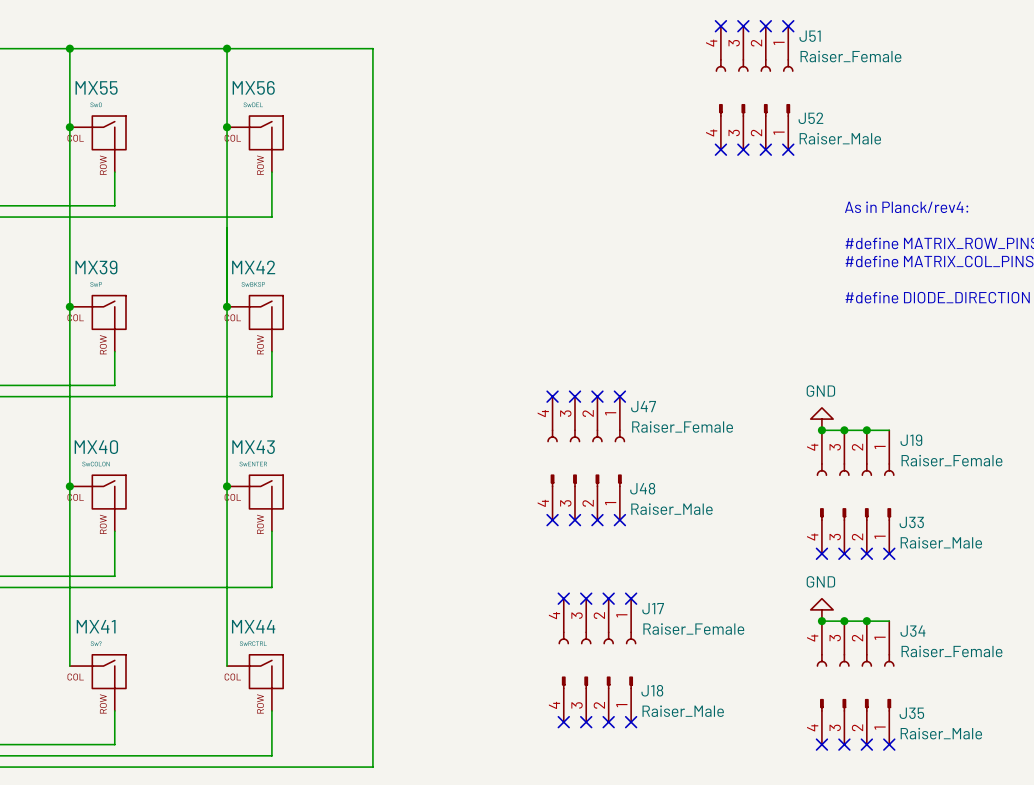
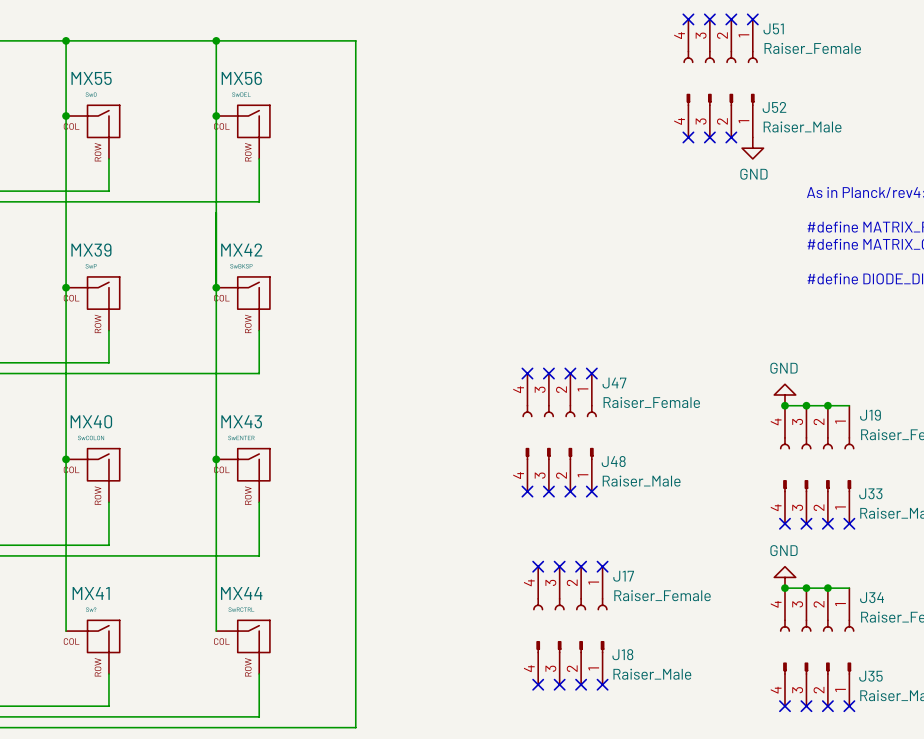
no-connect mark: (788, 149) -> none
power symbol: none -> GND (752, 148)

